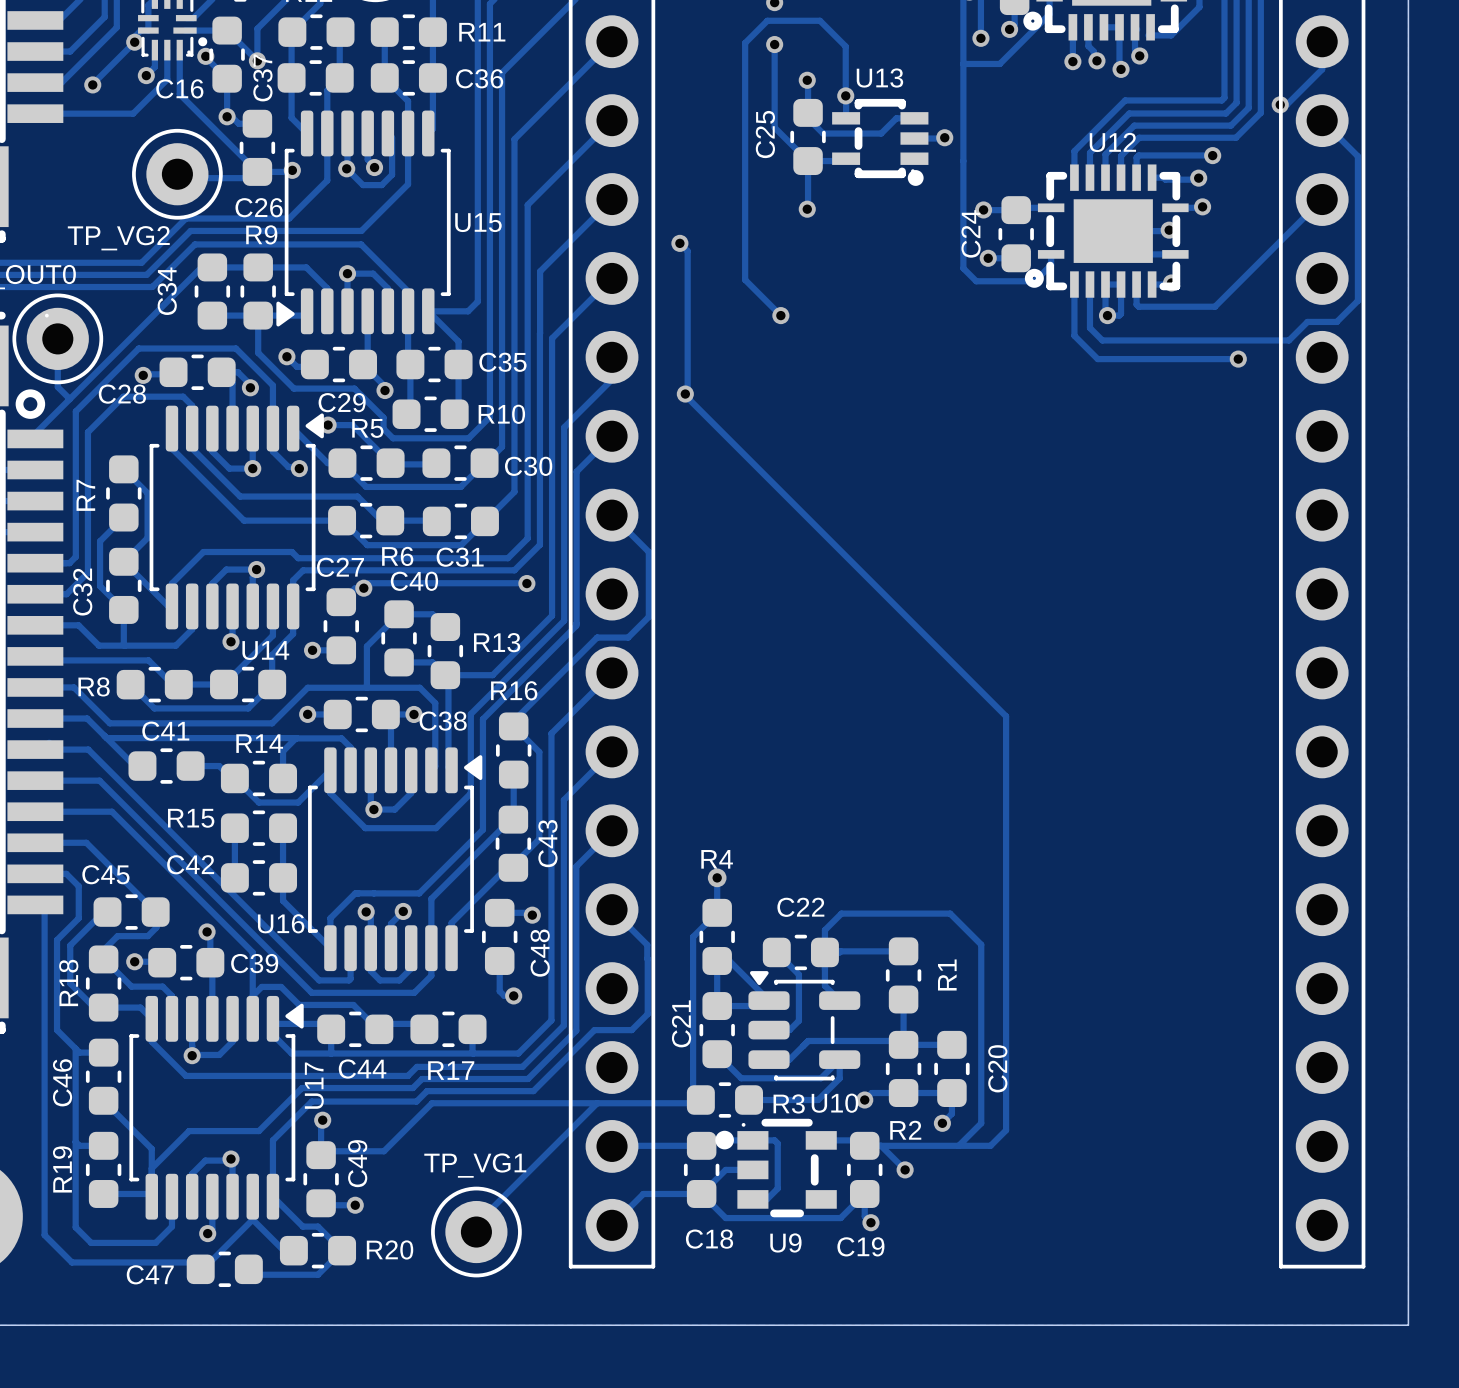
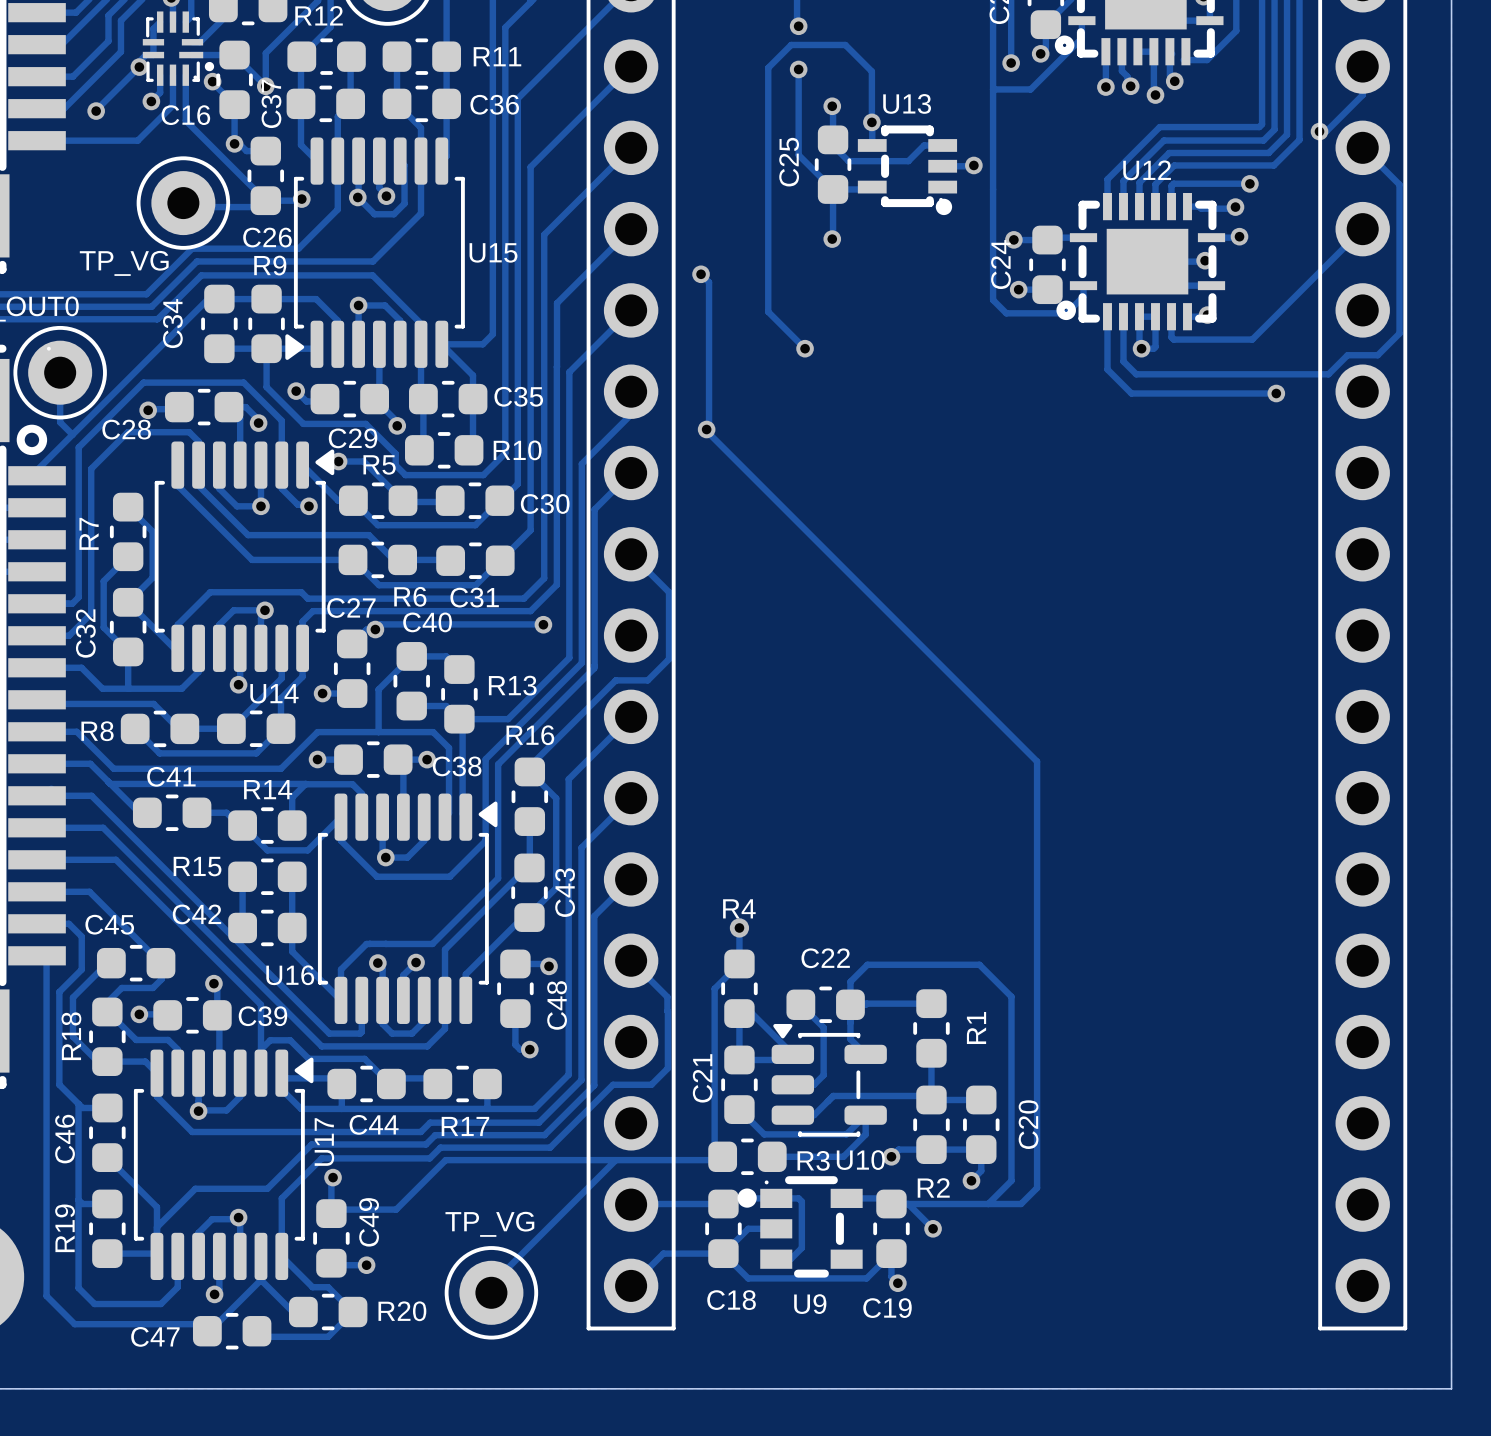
TP_VG2 name: TP_VG2 (118, 238) -> TP_VG (124, 263)
TP_VG1 name: TP_VG1 (475, 1165) -> TP_VG (489, 1224)

